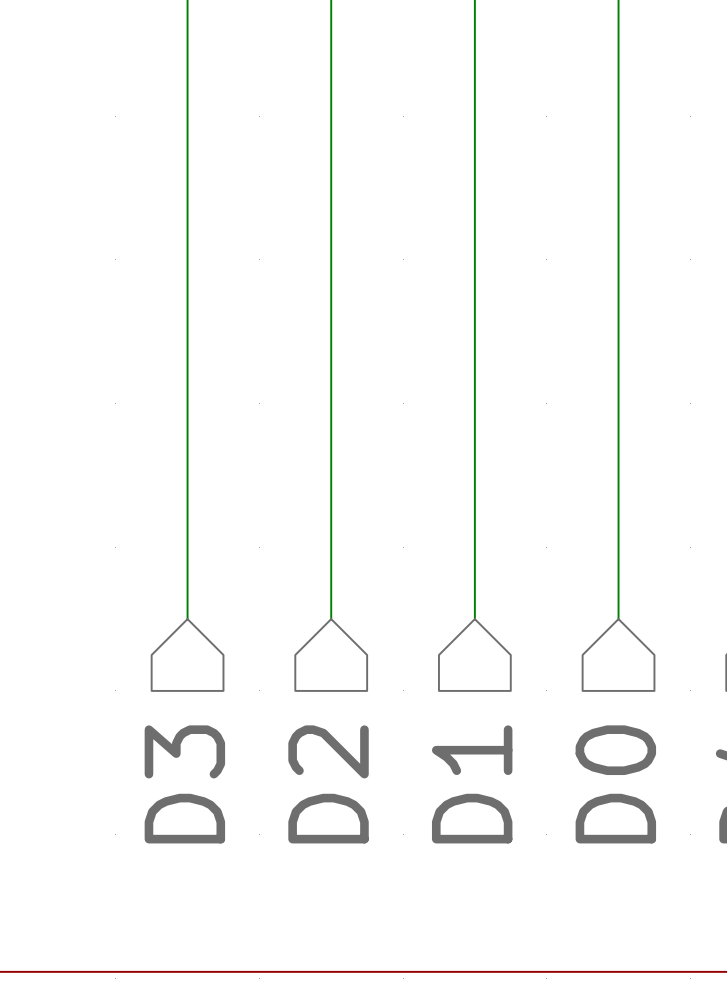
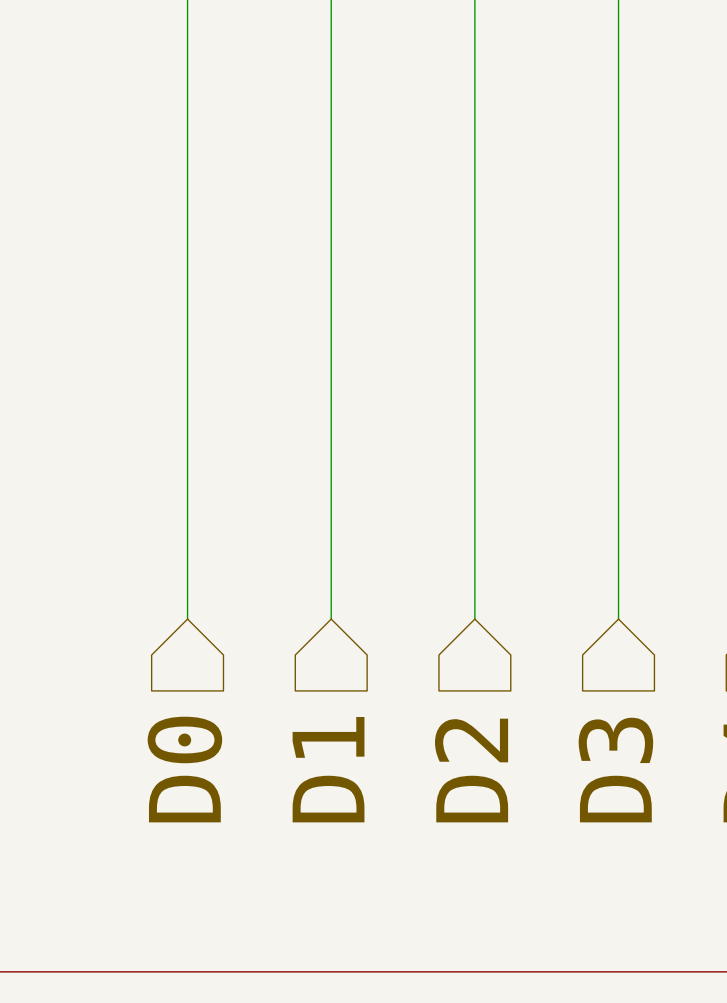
hierarchical label: D3 (184, 784) -> D0 (184, 769)
hierarchical label: D2 (328, 784) -> D1 (328, 769)
hierarchical label: D1 (472, 784) -> D2 (471, 770)
hierarchical label: D0 (615, 784) -> D3 (615, 770)

